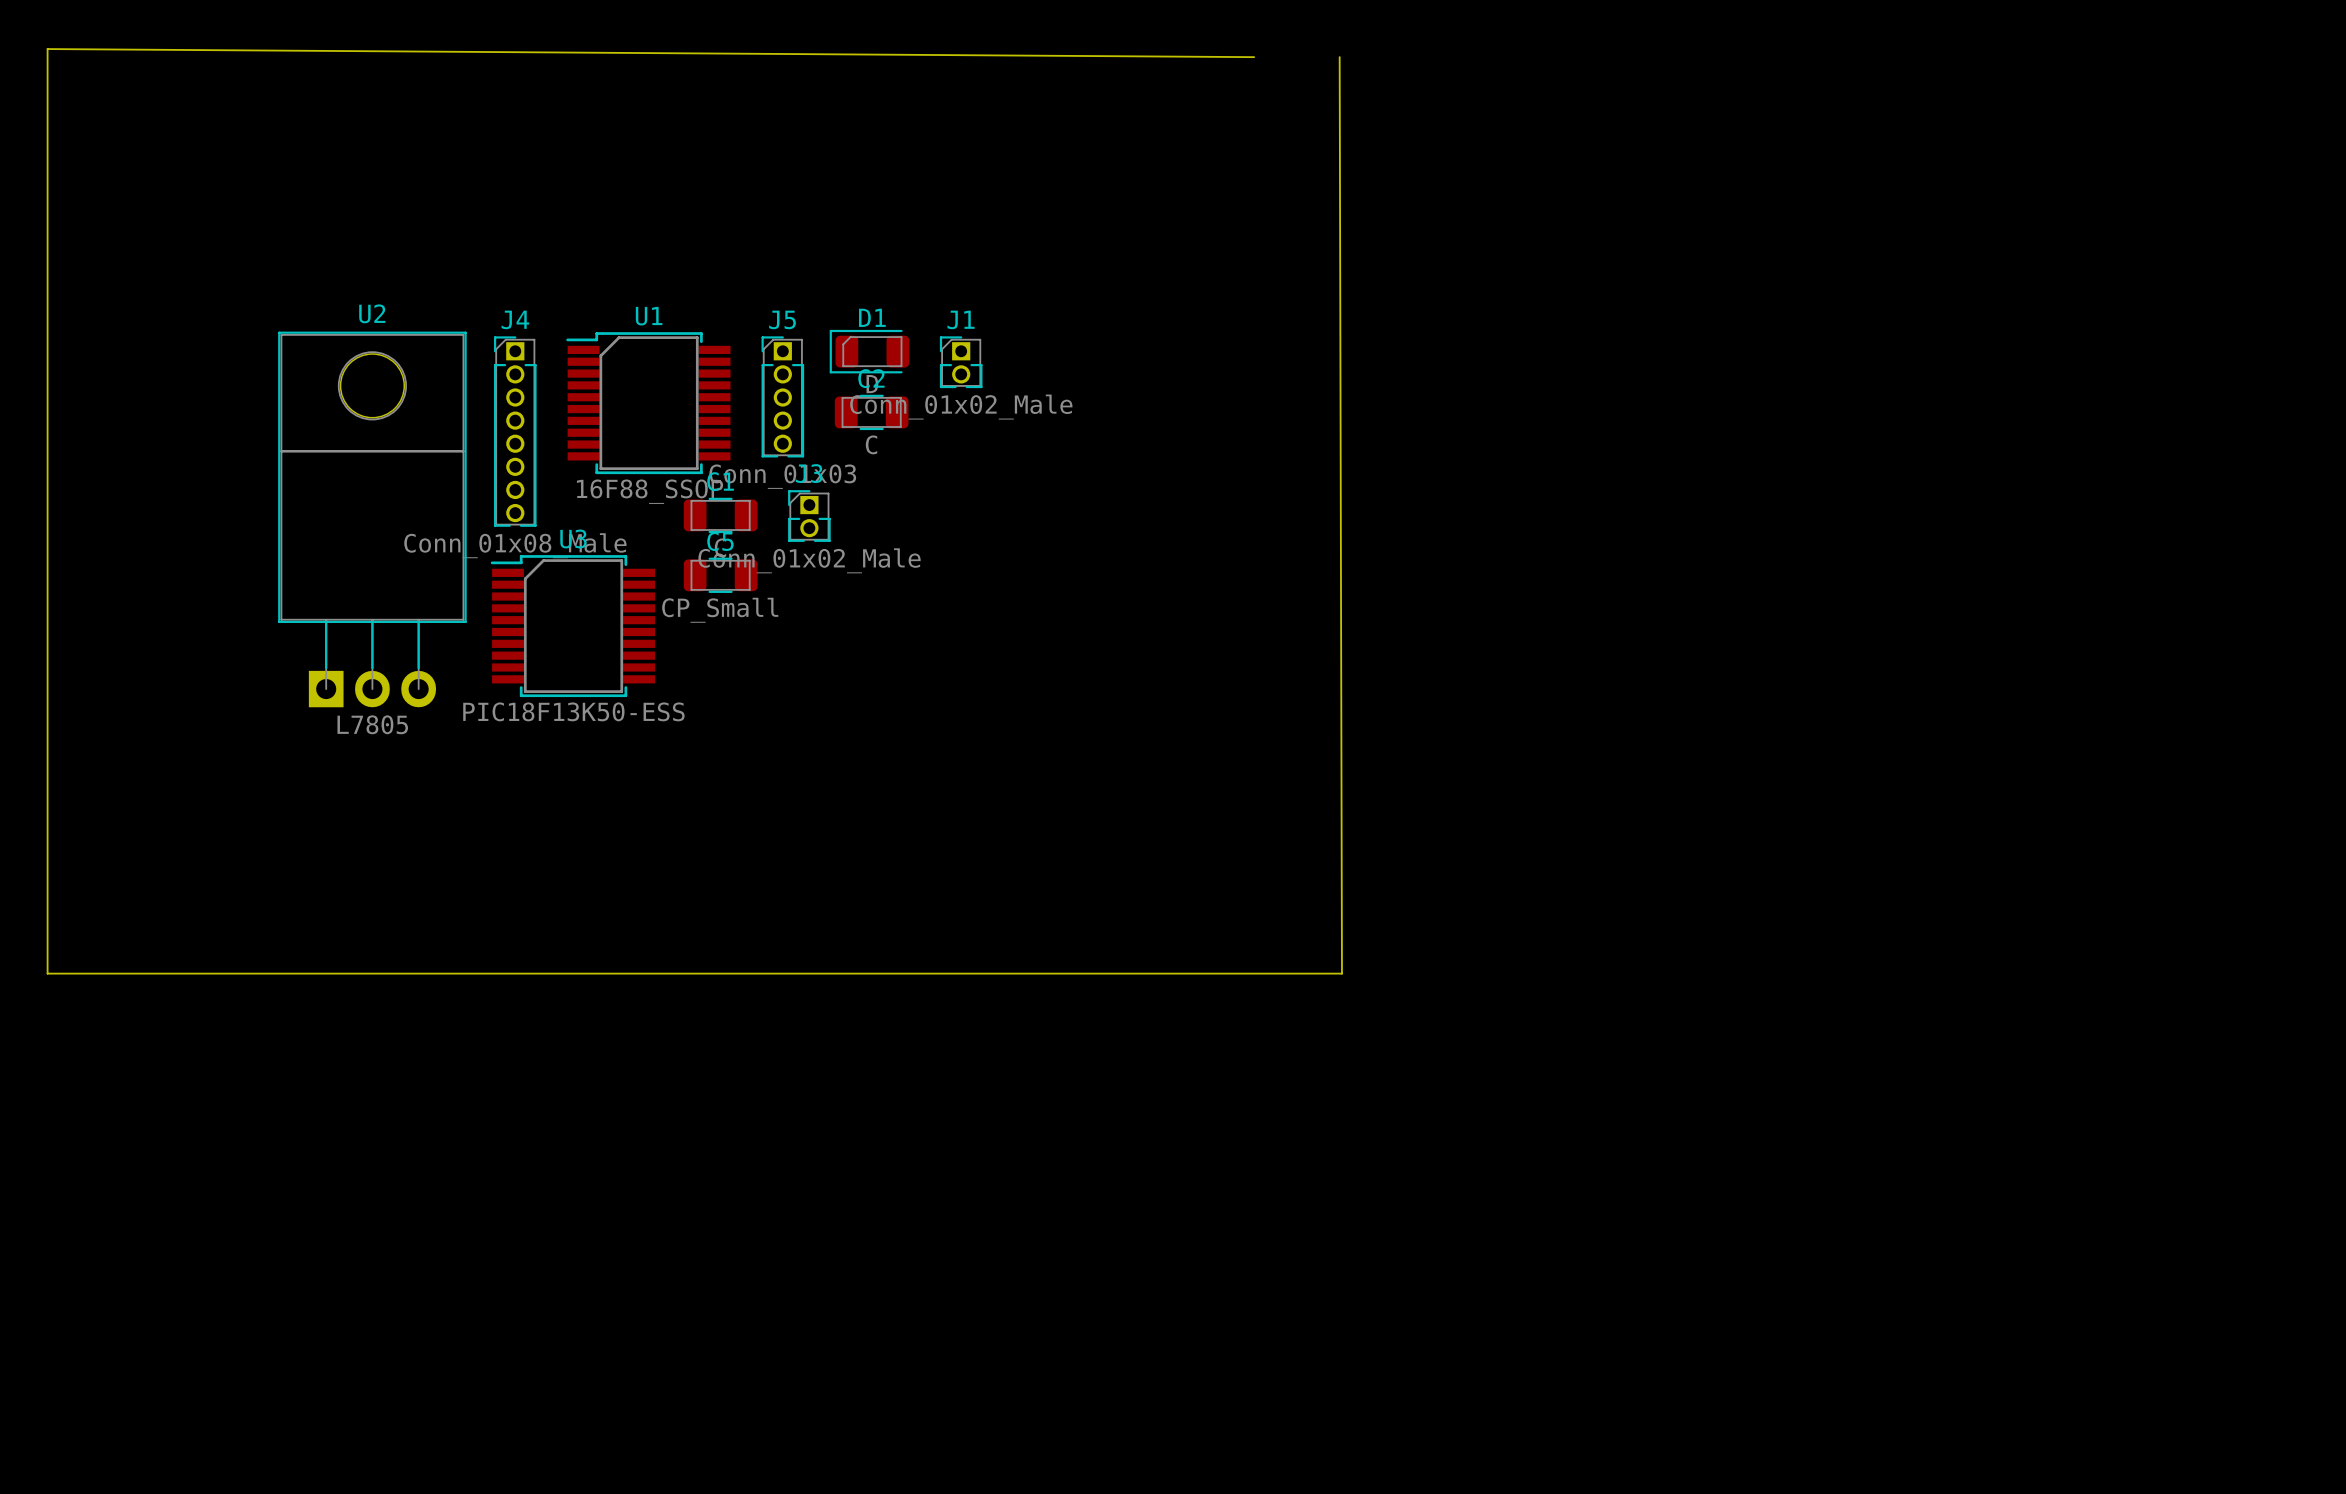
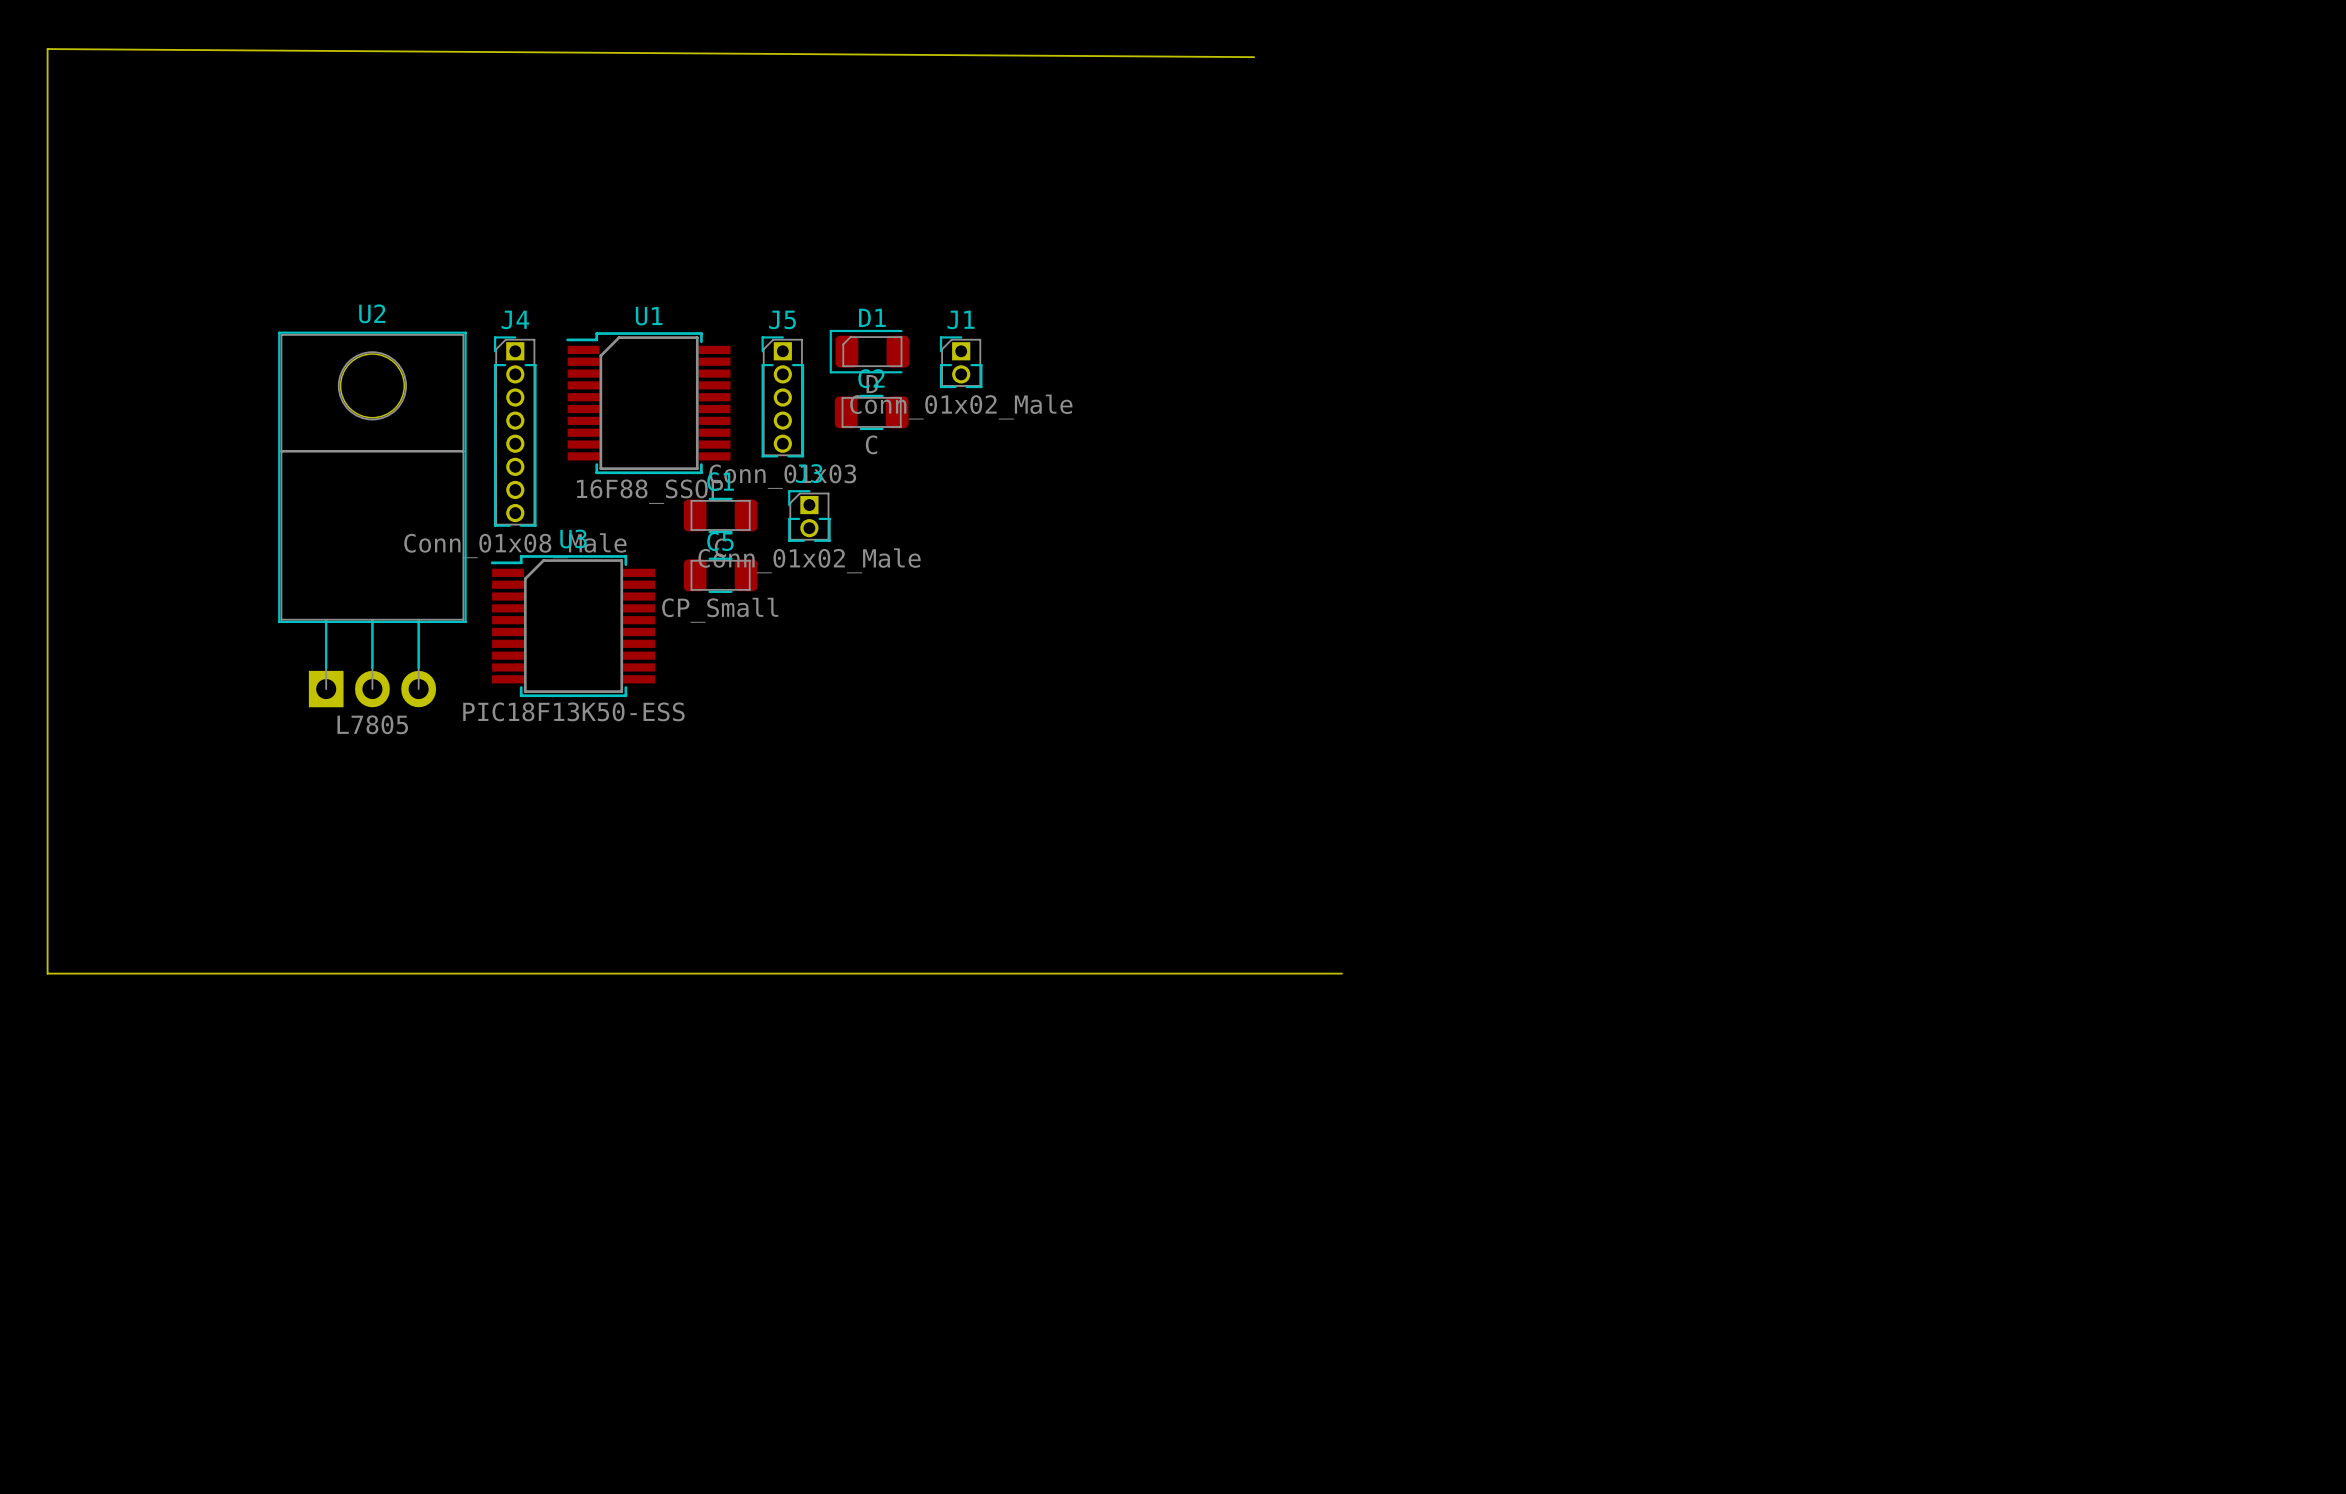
board edge: (1339, 57) (1341, 973) -> none

